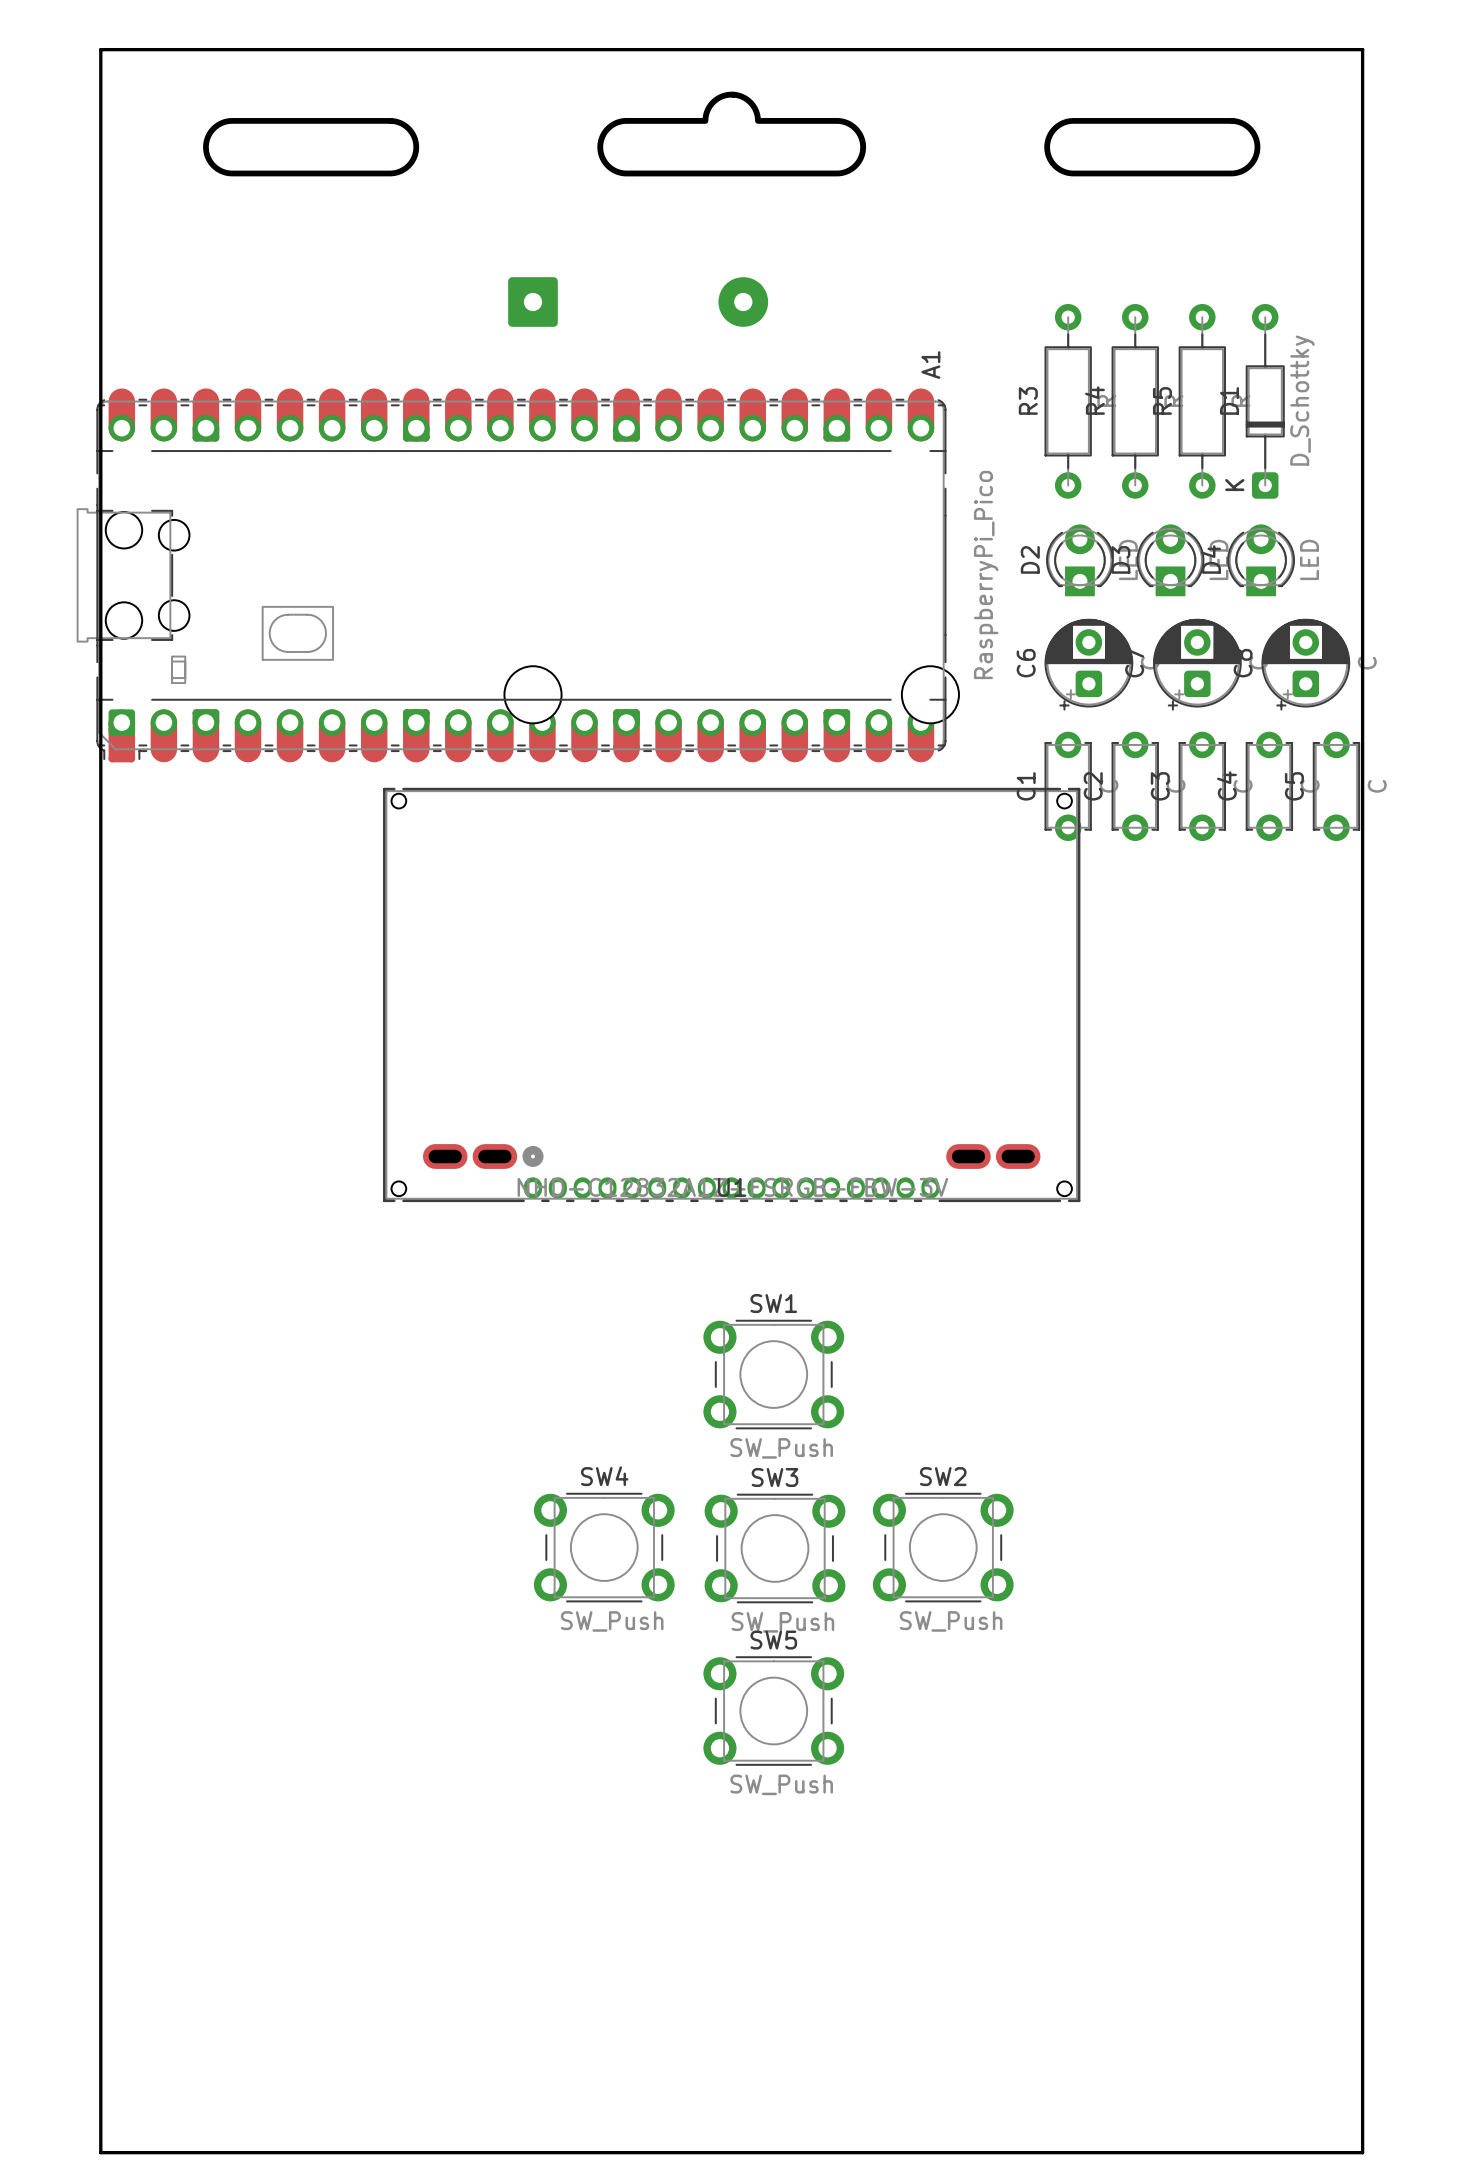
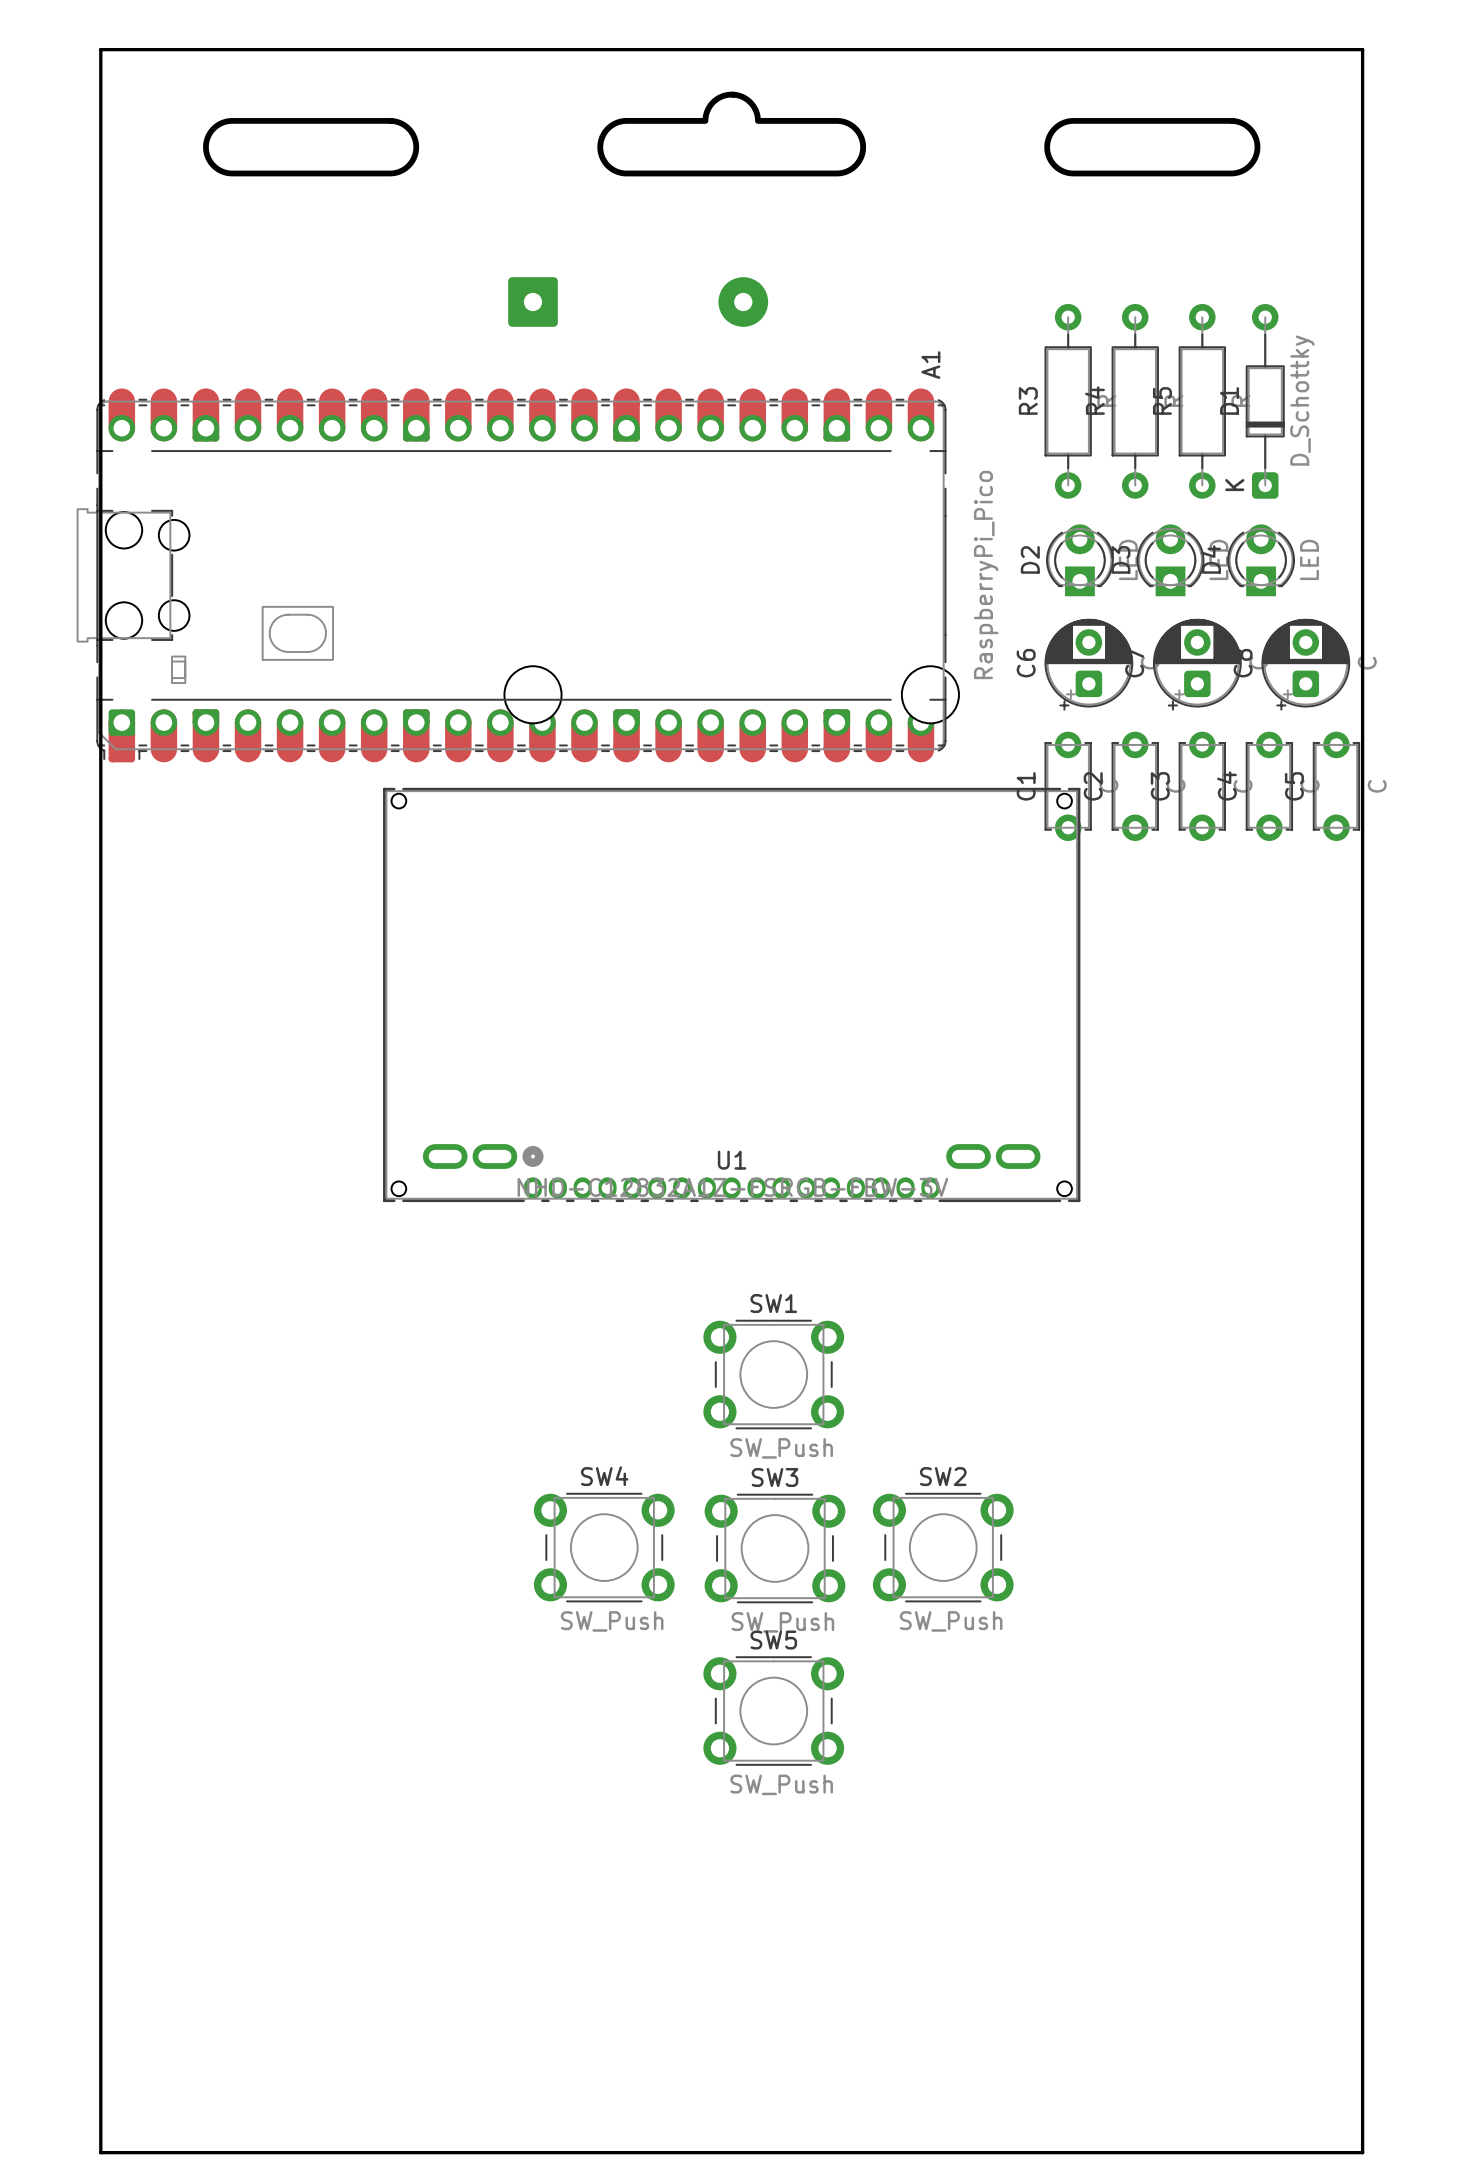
U1 footprint: [383, 787, 1081, 1203] -> [383, 787, 1081, 1203]

